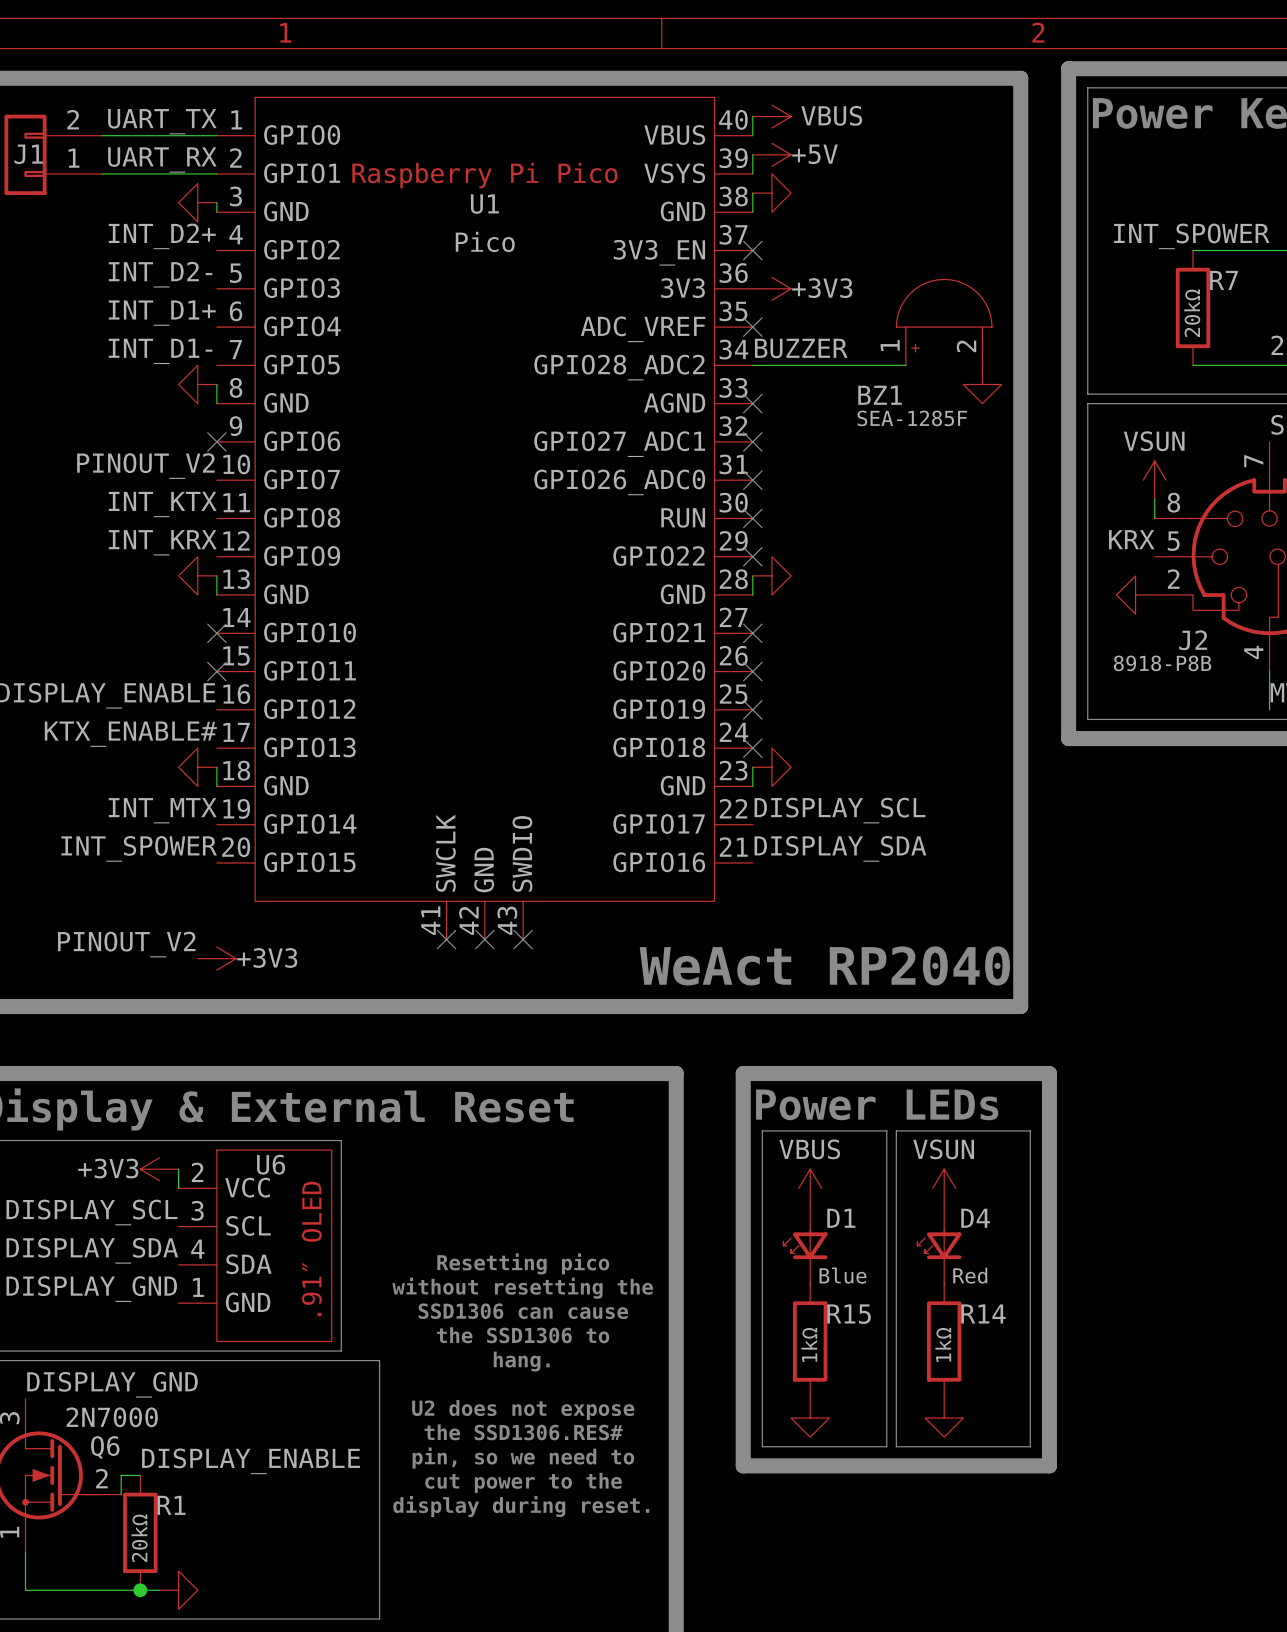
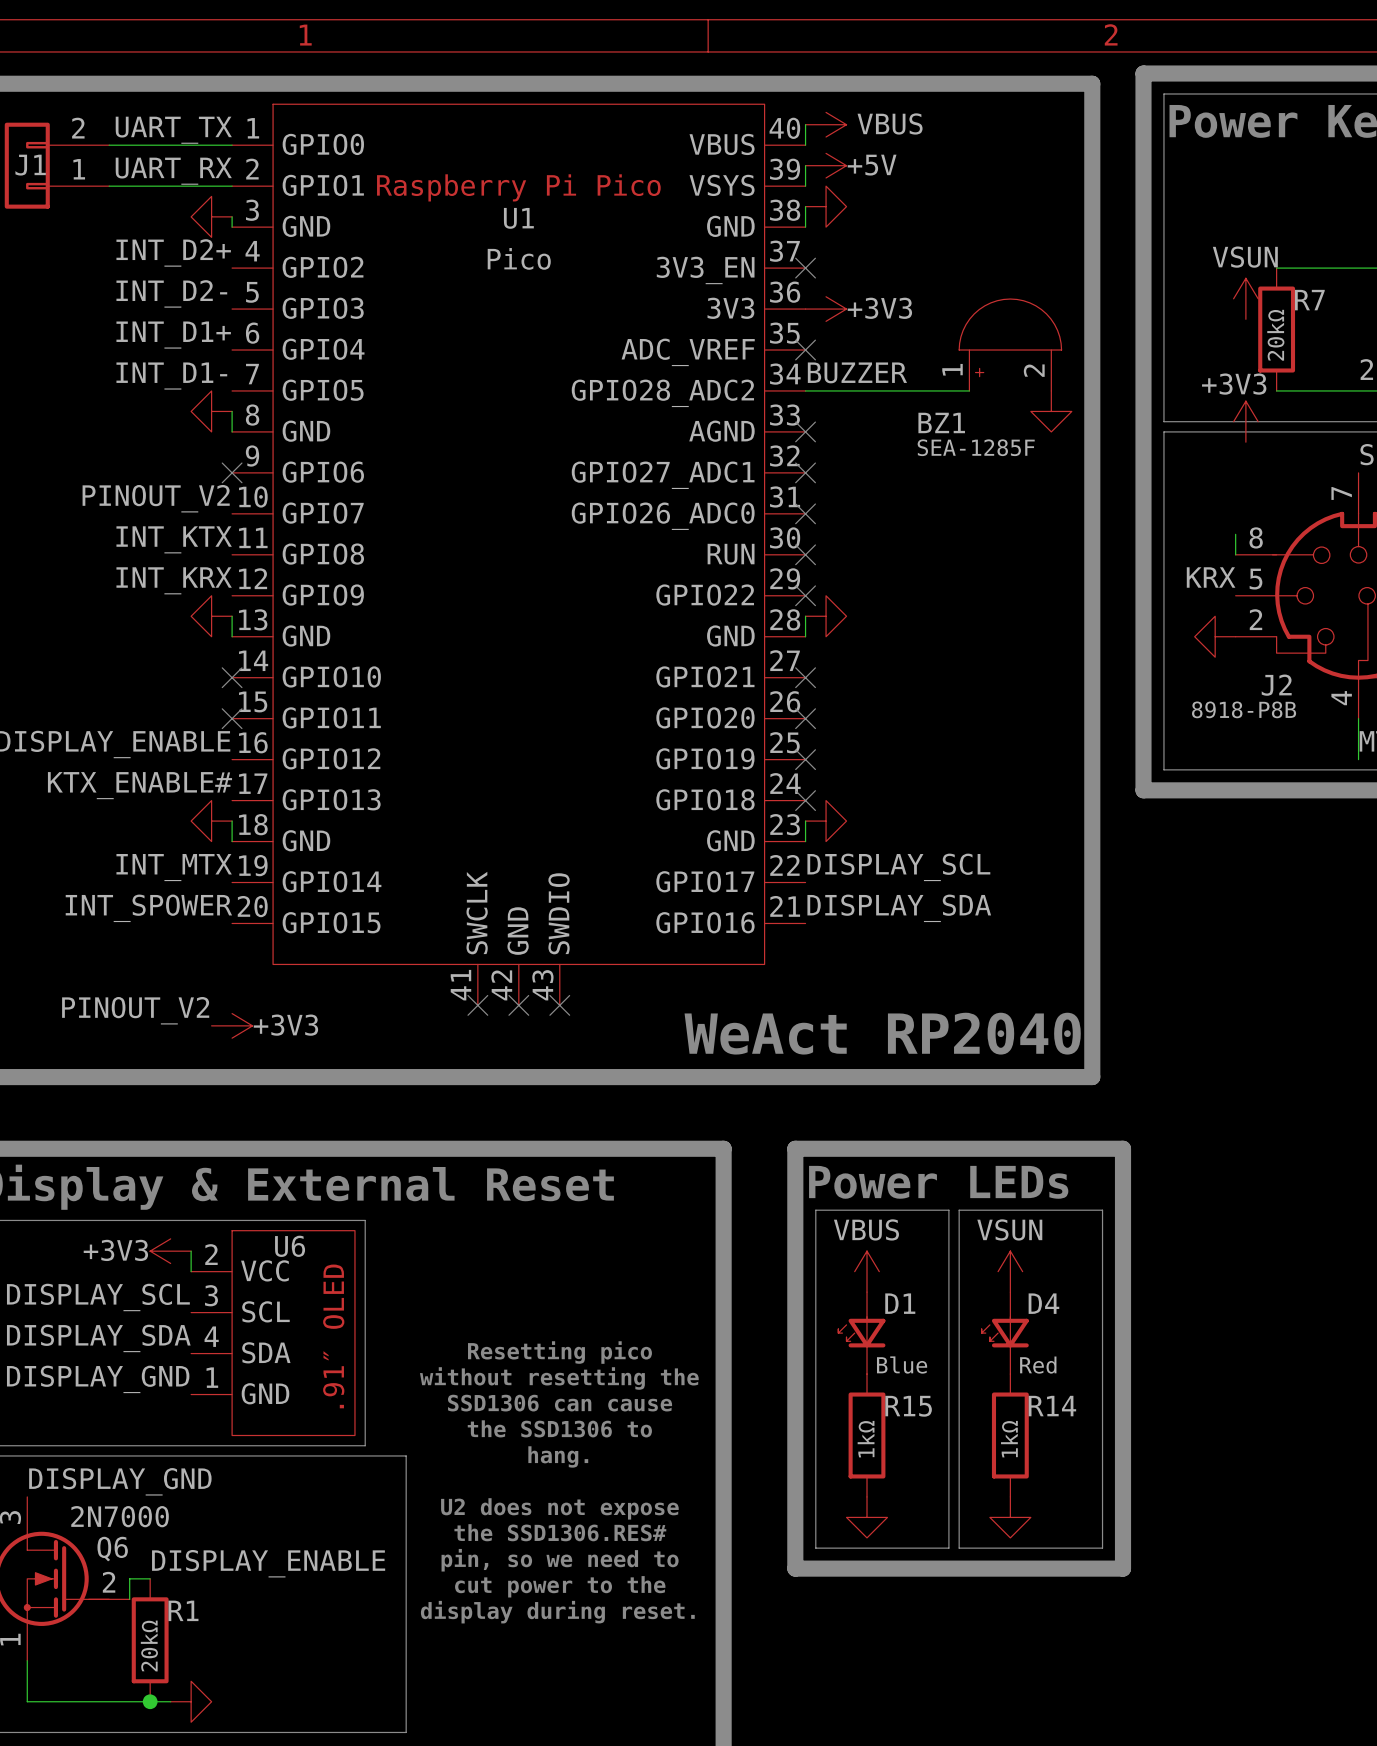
label: INT_SPOWER (1191, 236) -> none
power symbol: none -> VSUN (1245, 298)
power symbol: none -> +3V3 (1245, 421)
power symbol: VSUN (1154, 480) -> none

